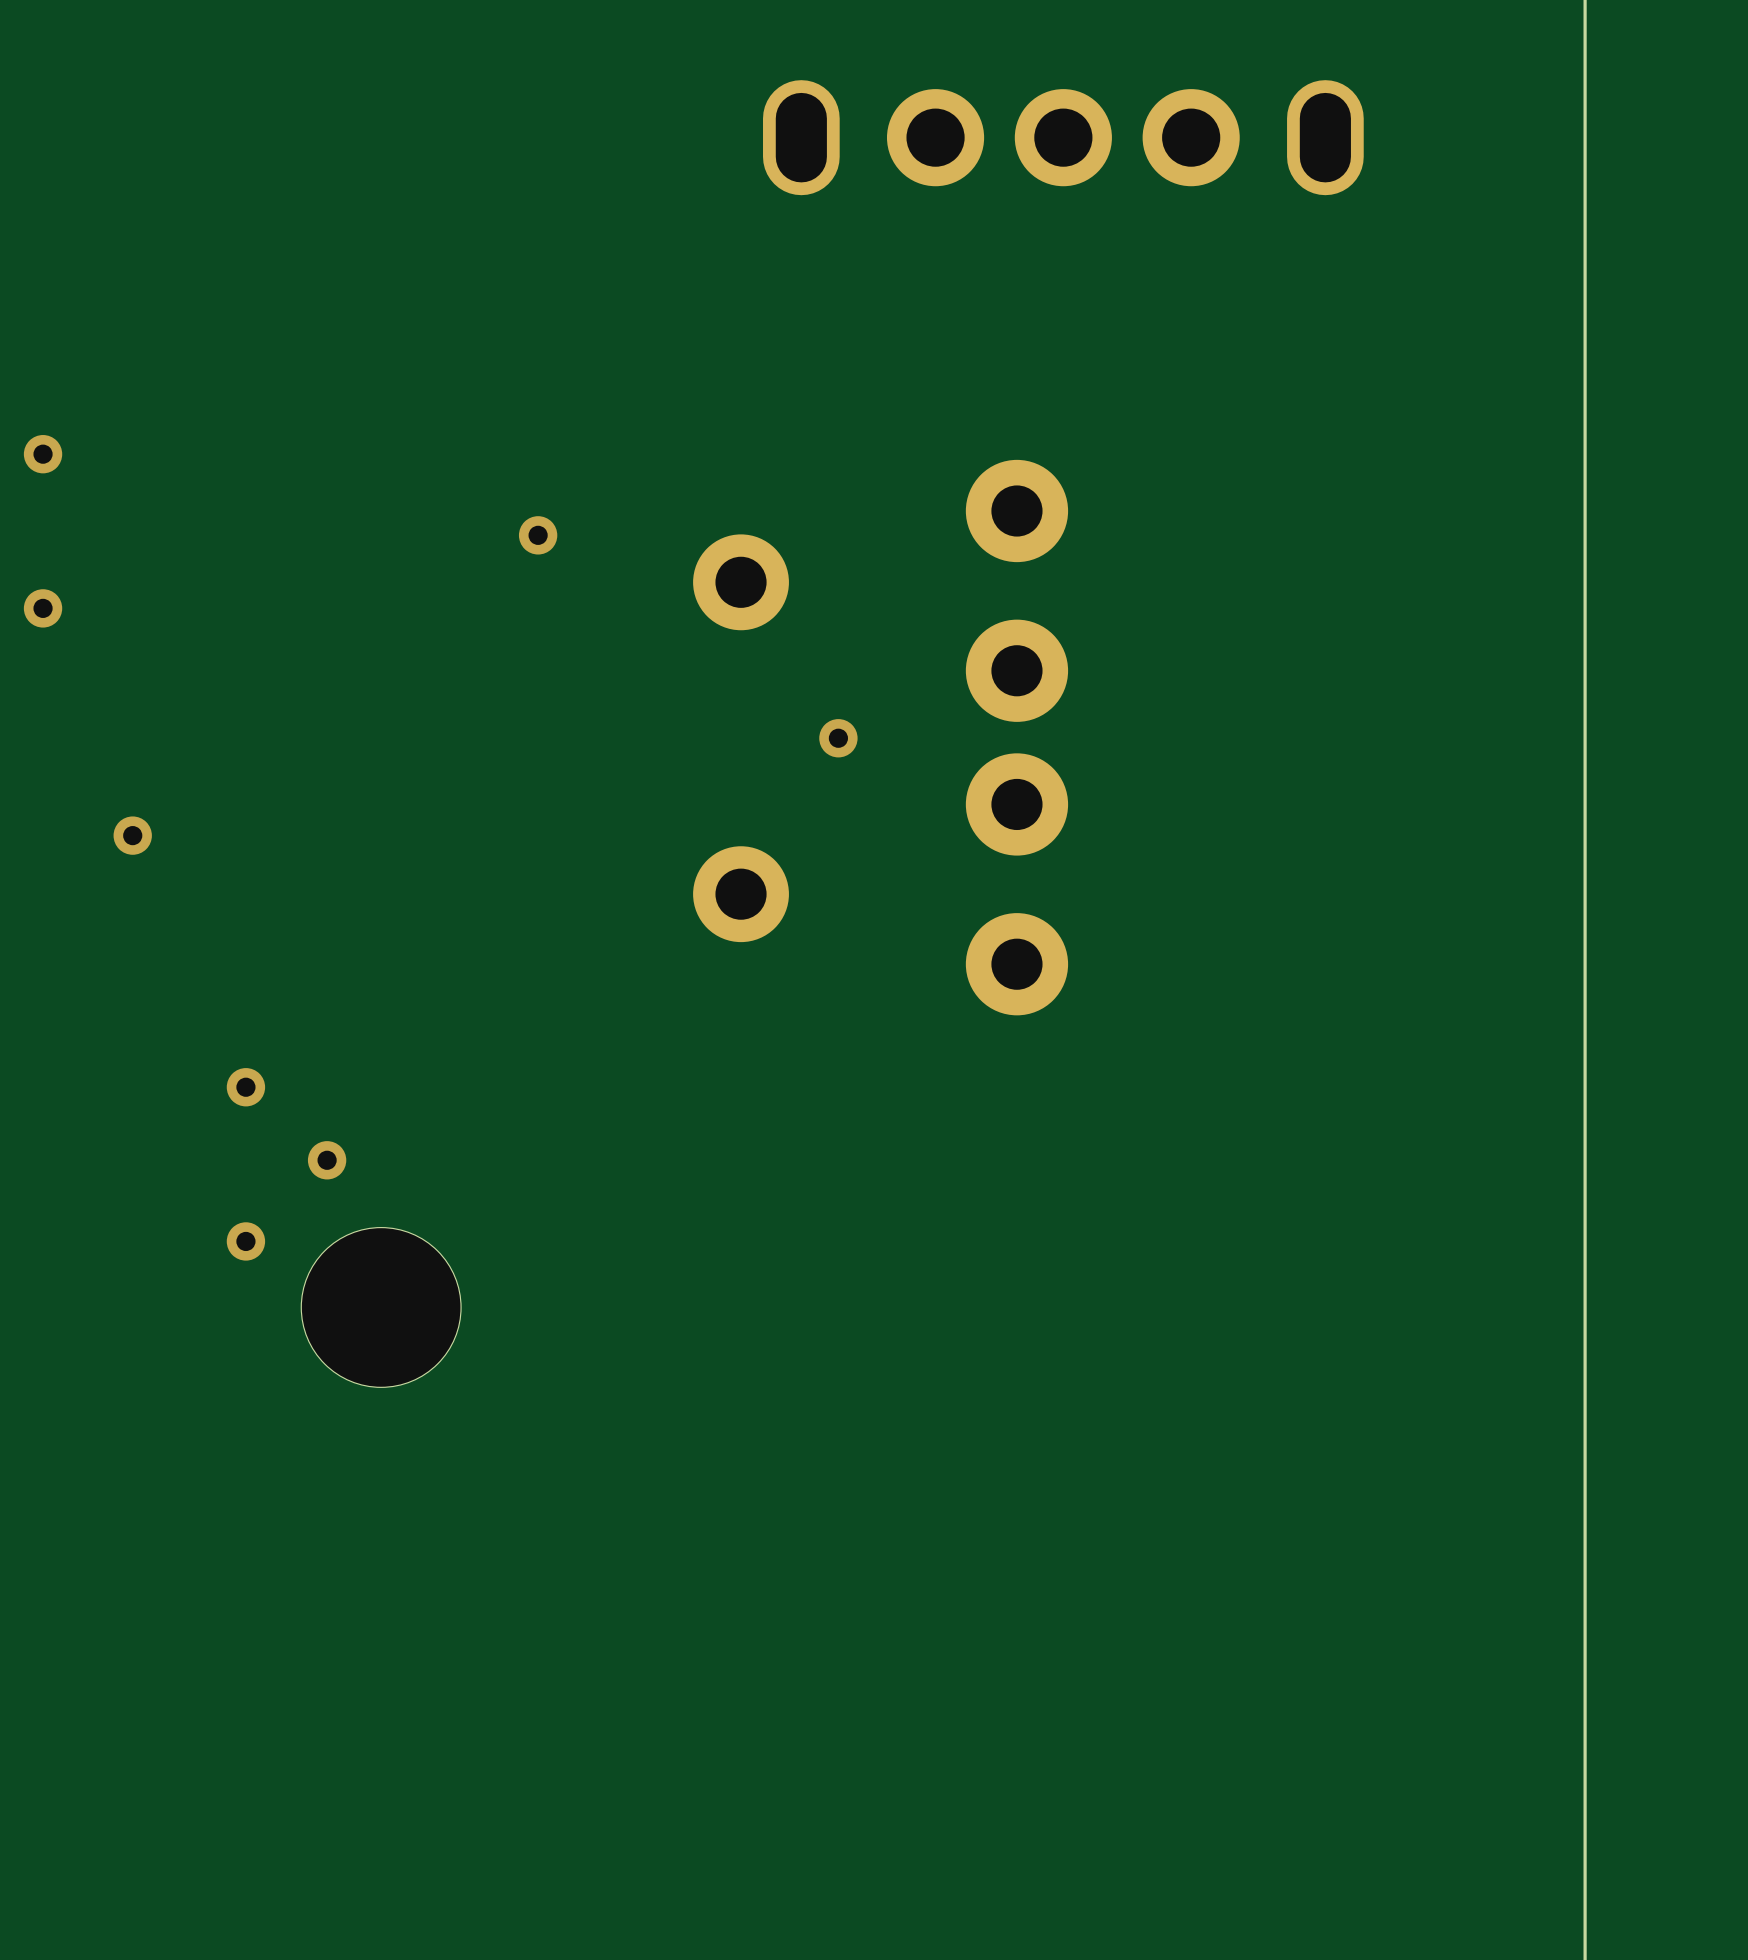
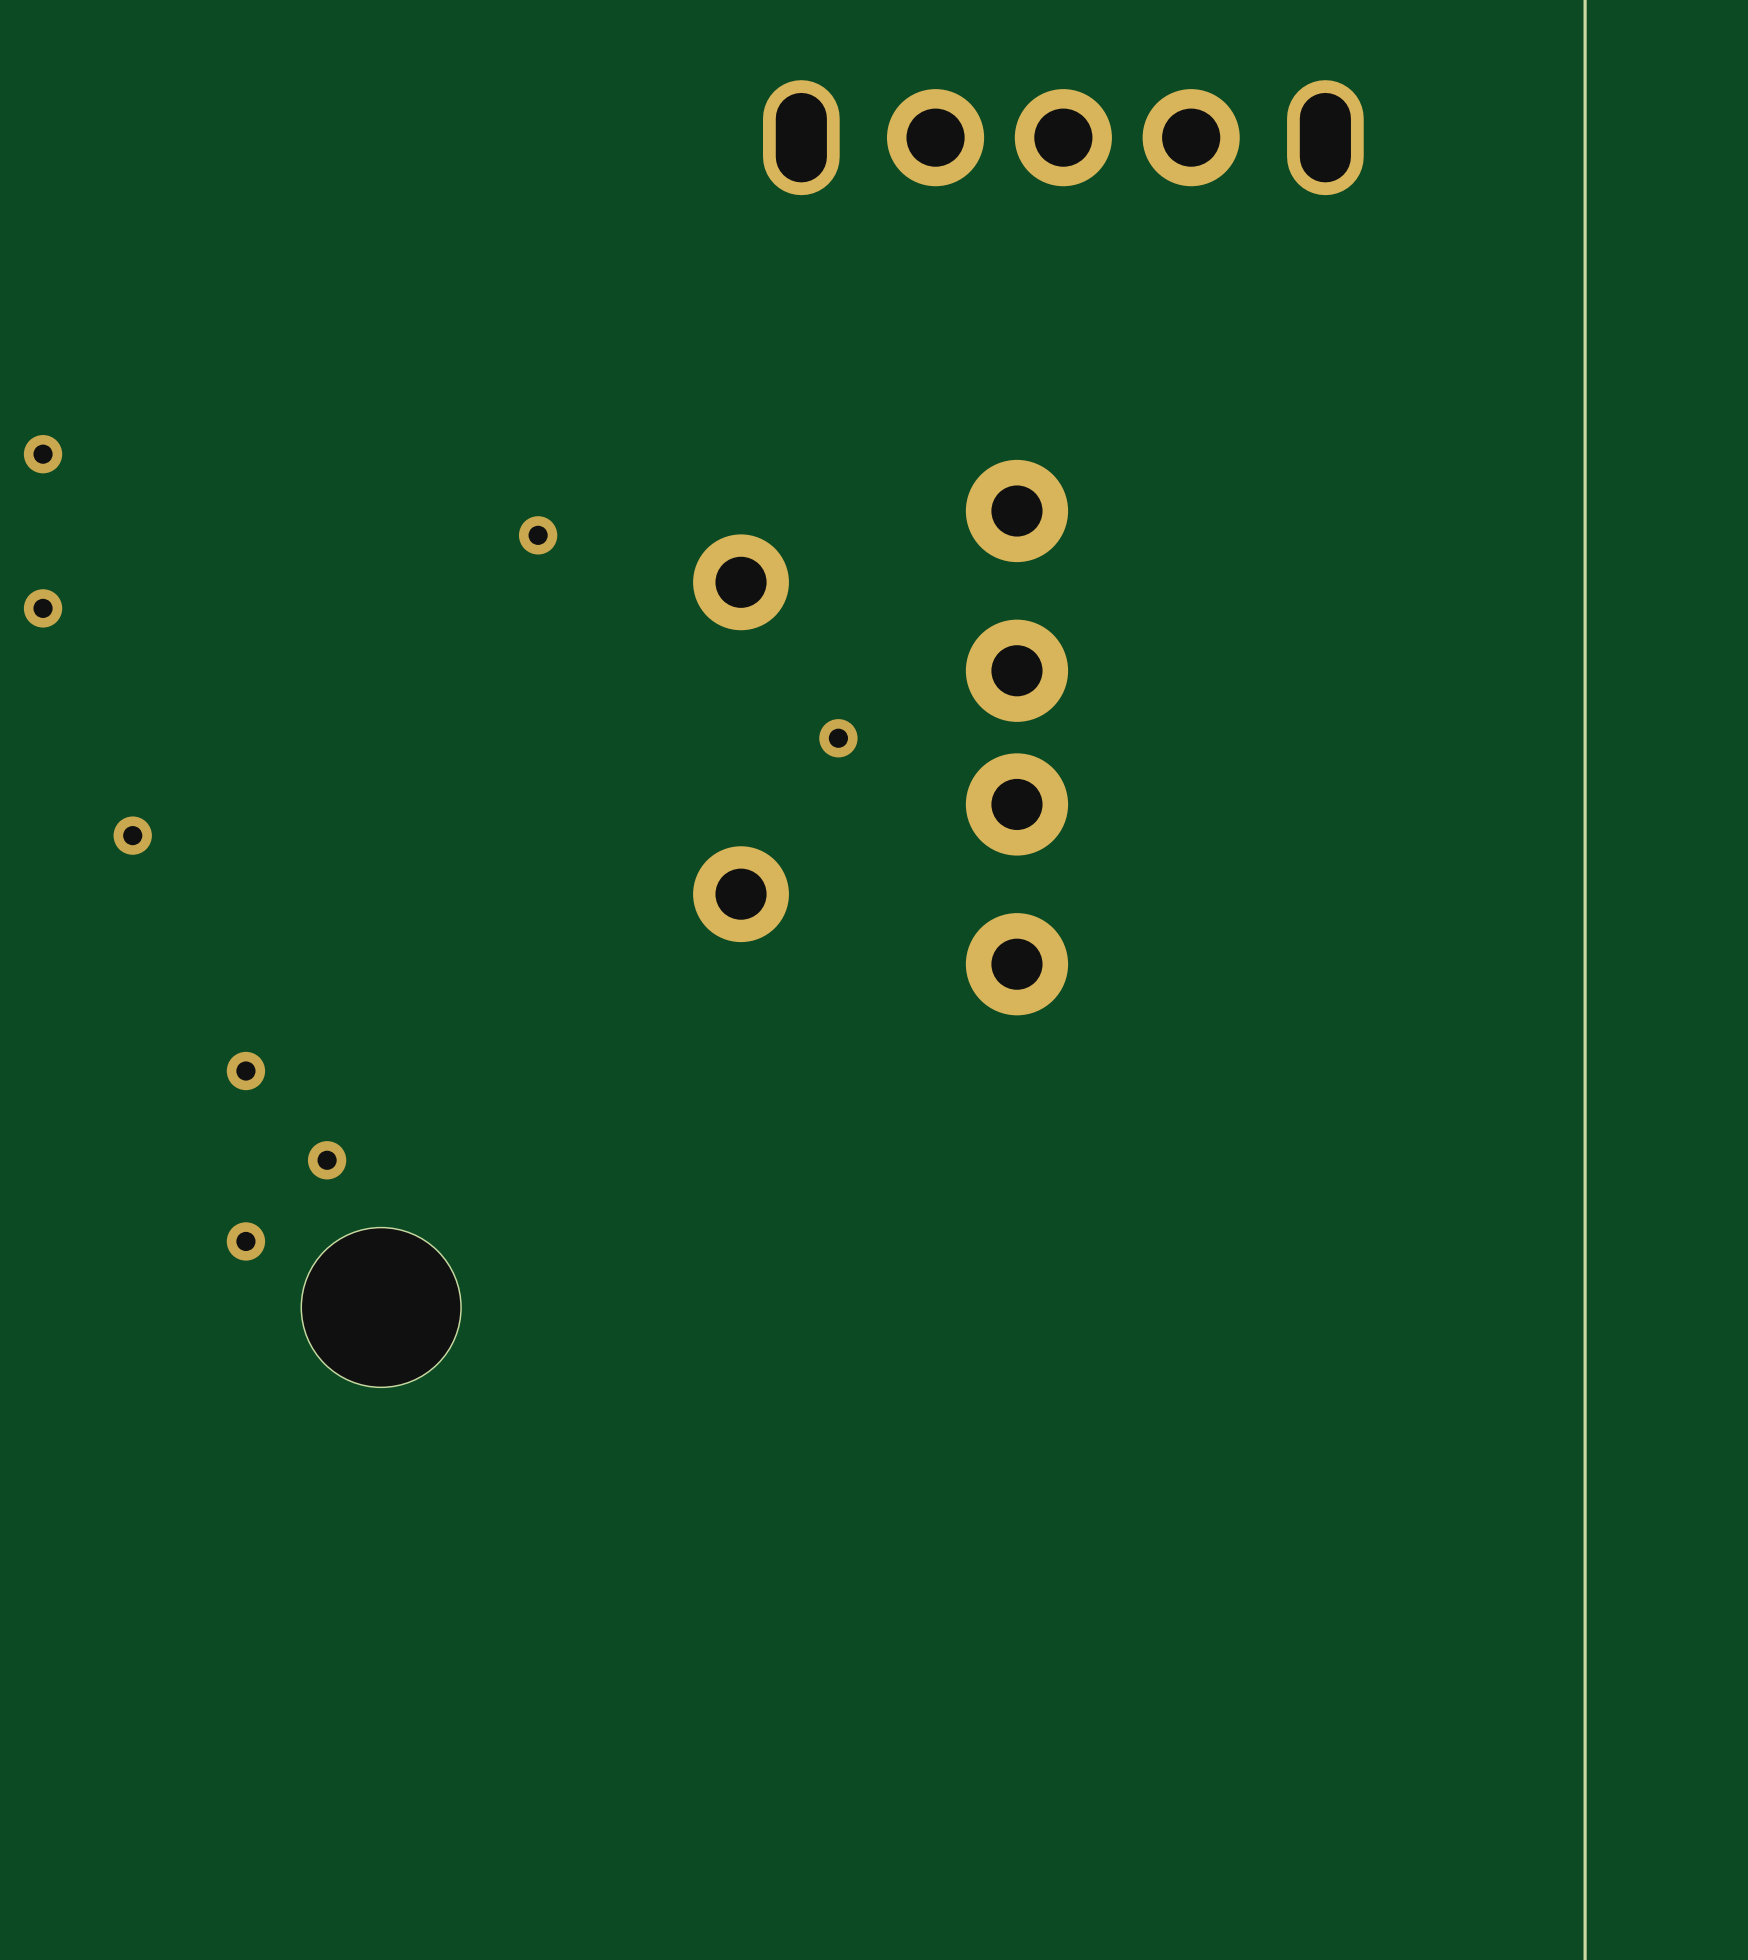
via position: (245, 1087) -> (245, 1071)

